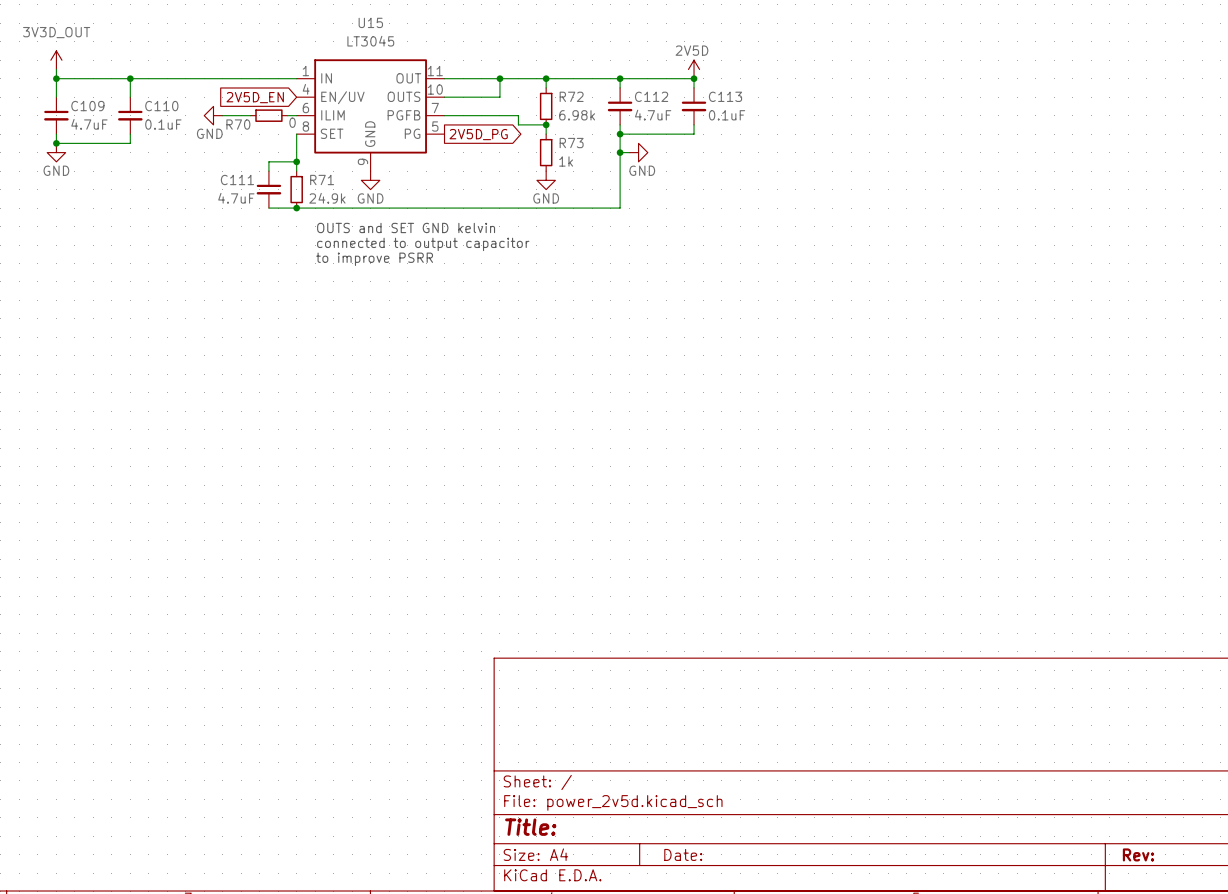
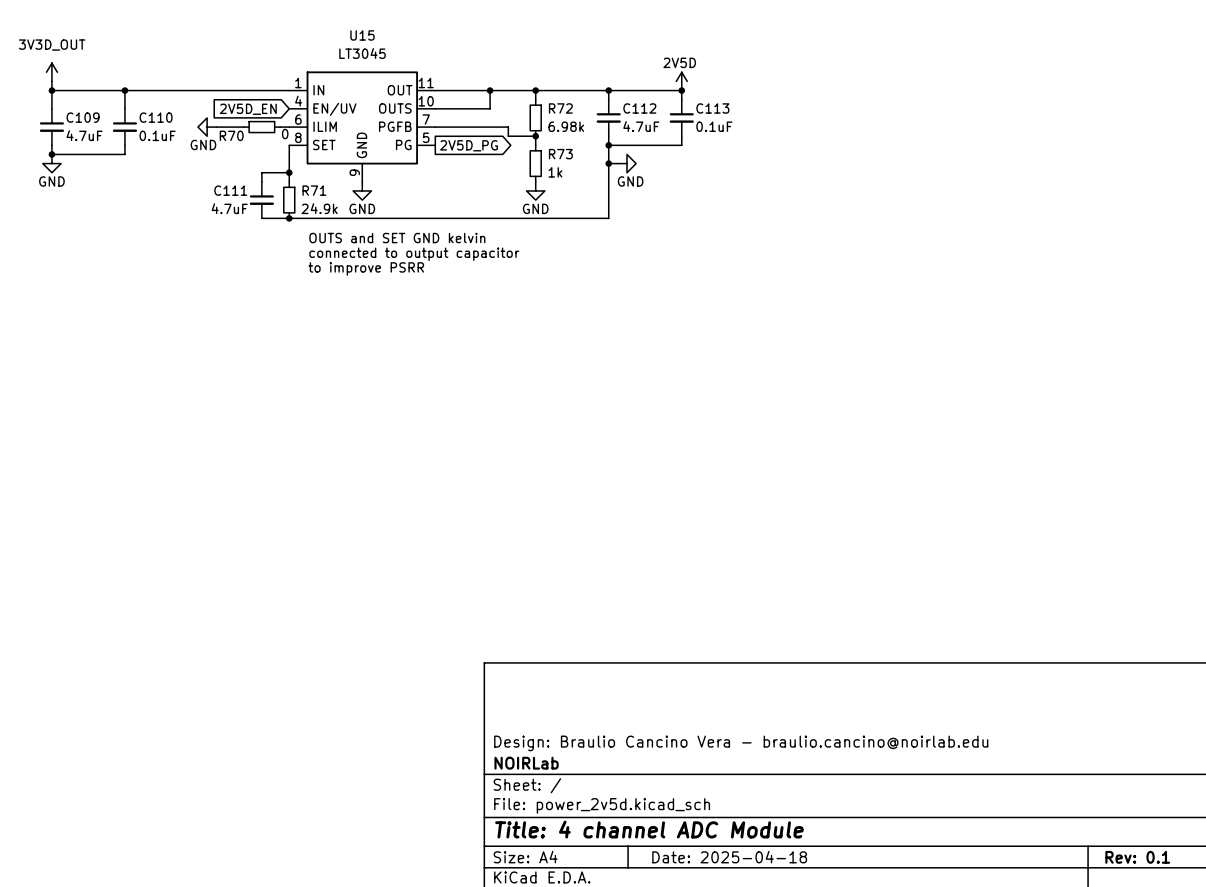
title block: none -> Design: Braulio Cancino Vera - braulio.cancino@noirlab.edu (741, 743)
title block: none -> NOIRLab (526, 763)
title block: Title: (530, 827) -> Title: 4 channel ADC Module (649, 829)
title block: Date: (683, 854) -> Date: 2025-04-18 (729, 857)
title block: Rev: (1138, 854) -> Rev: 0.1 (1137, 857)

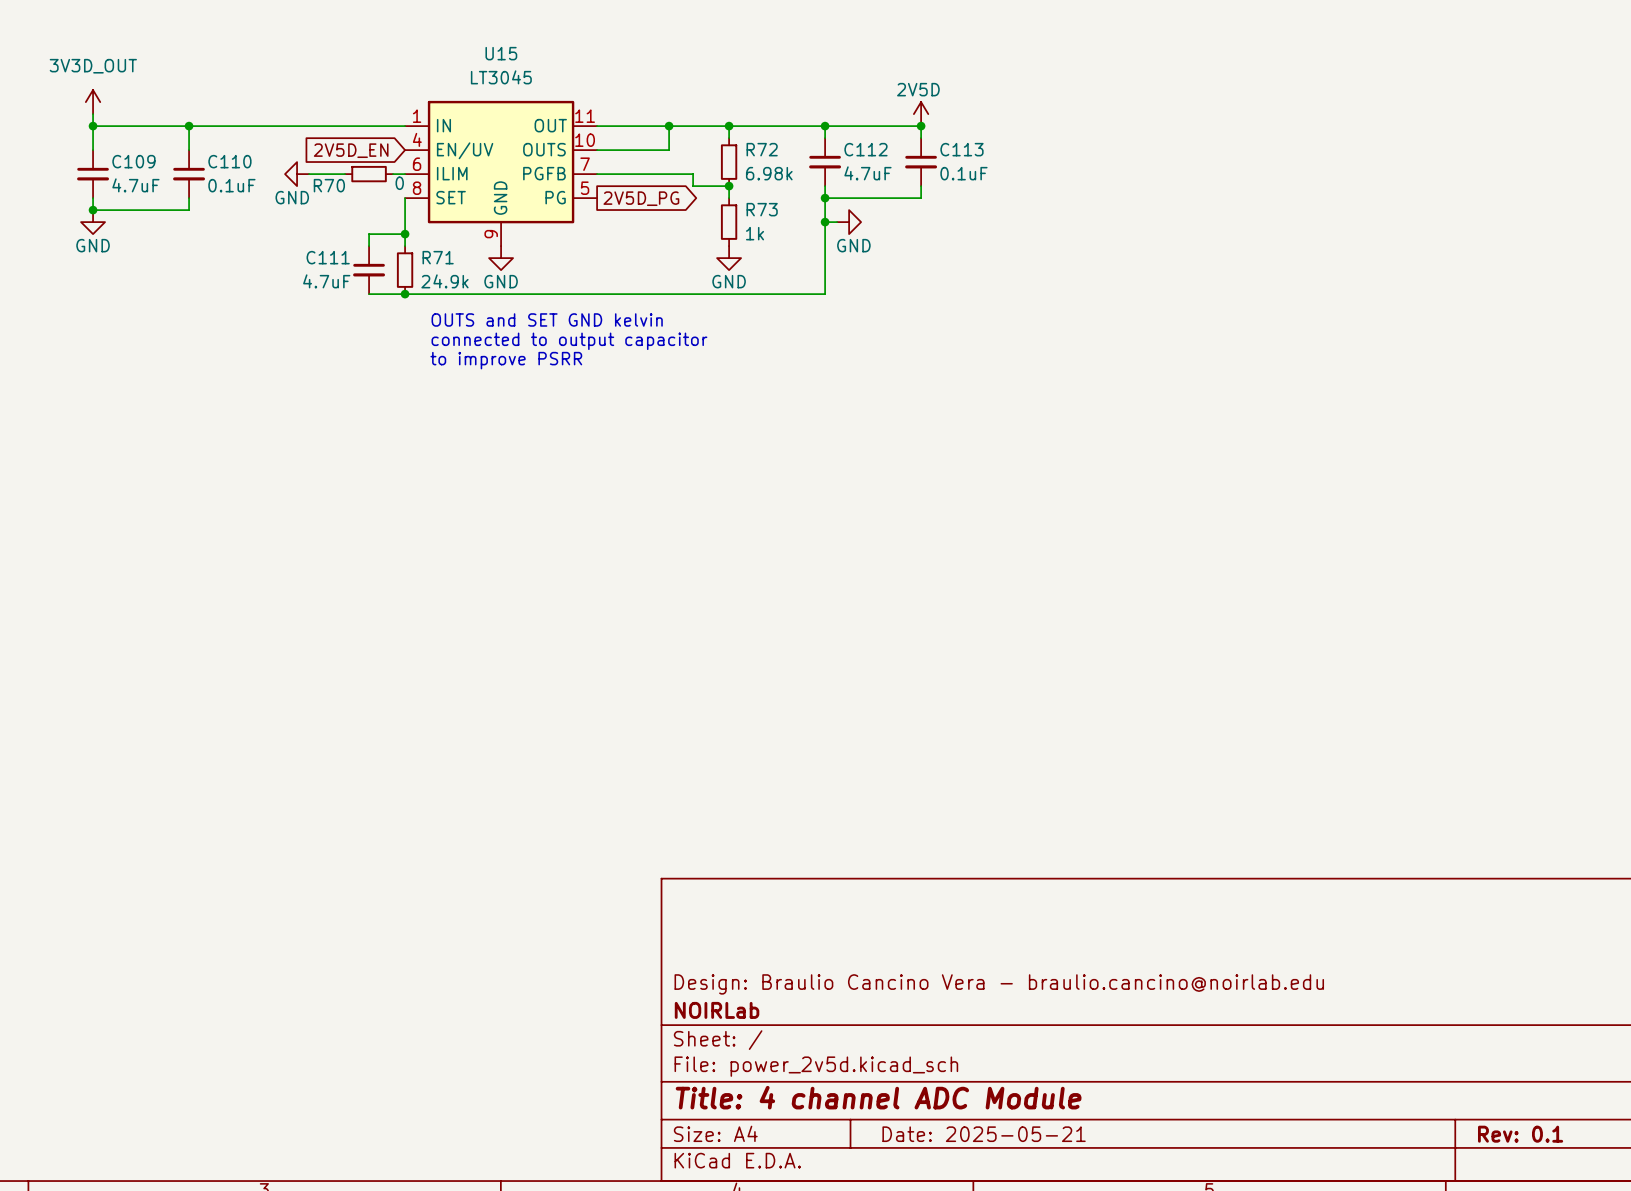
title block: Date: 2025-04-18 (729, 857) -> Date: 2025-05-21 (984, 1134)

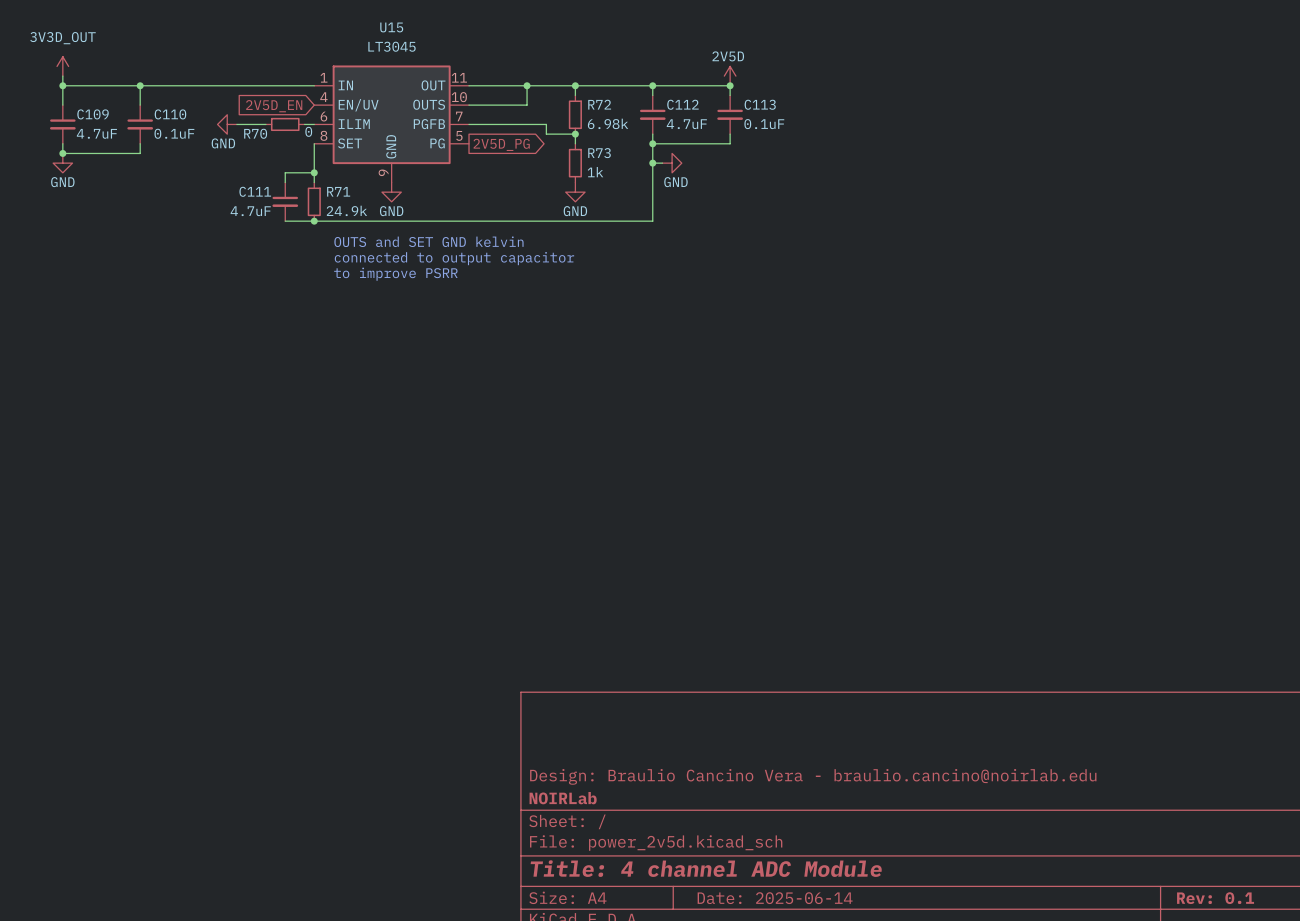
title block: Date: 2025-05-21 (984, 1134) -> Date: 2025-06-14 (775, 898)

